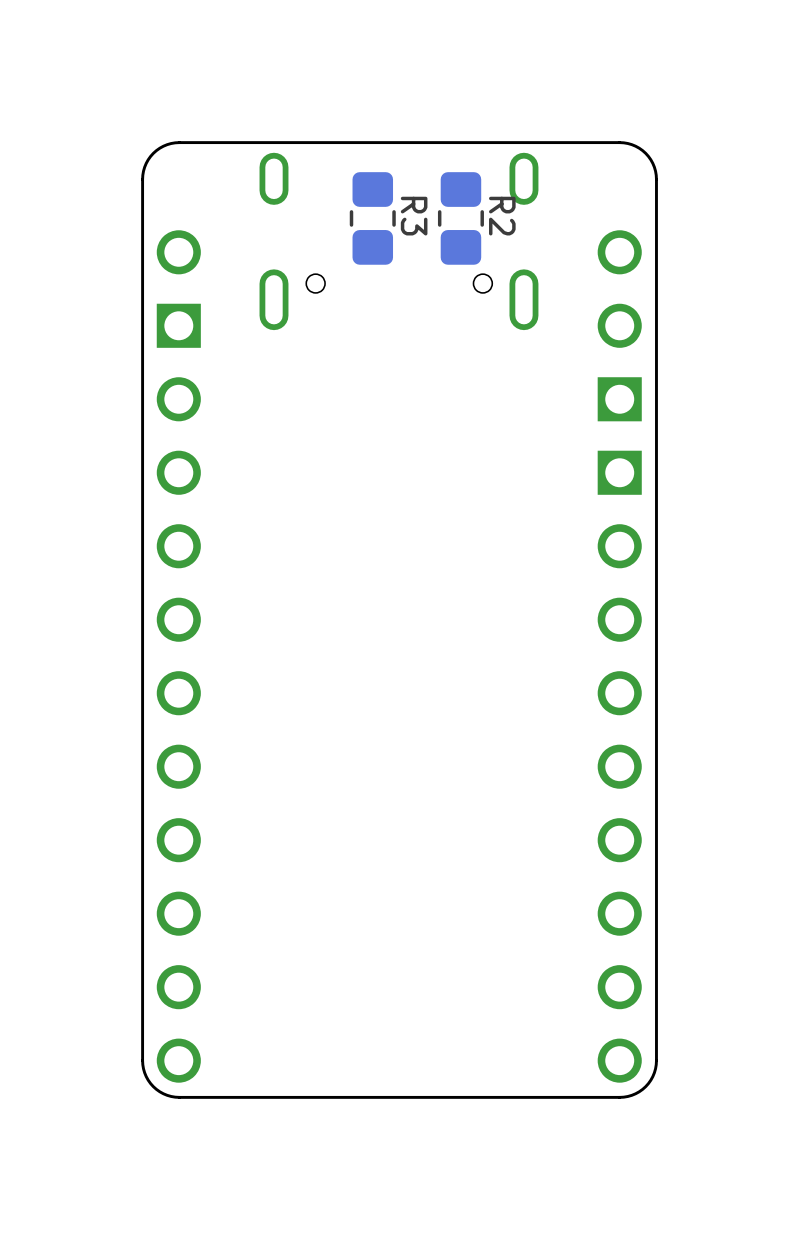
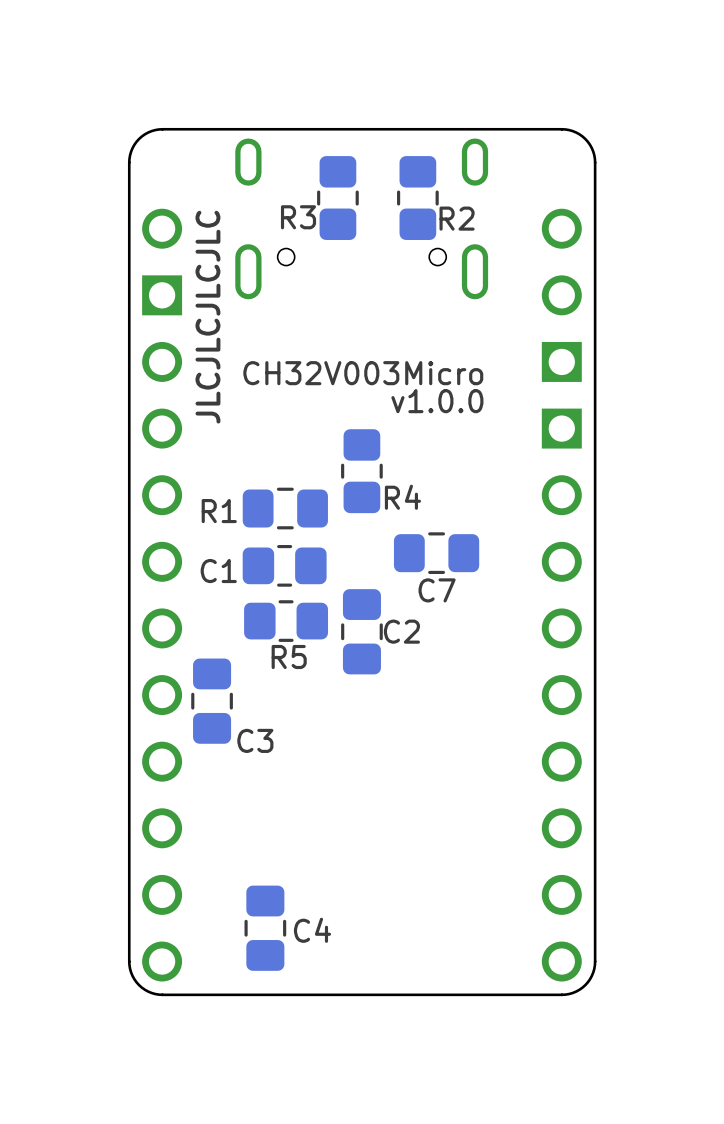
R3 name rotation: 0° (414, 216) -> 90° counterclockwise (298, 217)
R3 name position: R3 (414, 216) -> R3 (298, 217)
R2 name rotation: 0° (502, 216) -> 90° counterclockwise (457, 218)
drawing: none -> [195, 210, 221, 424]
text: none -> CH32V003Micro (363, 373)
text: none -> v1.0.0 (437, 401)
R4: none -> (361, 471)
C1: none -> (285, 508)
C7: none -> (436, 553)
R1: none -> (284, 565)
R5: none -> (286, 621)
C2: none -> (361, 631)
C3: none -> (212, 701)
C4: none -> (265, 928)

